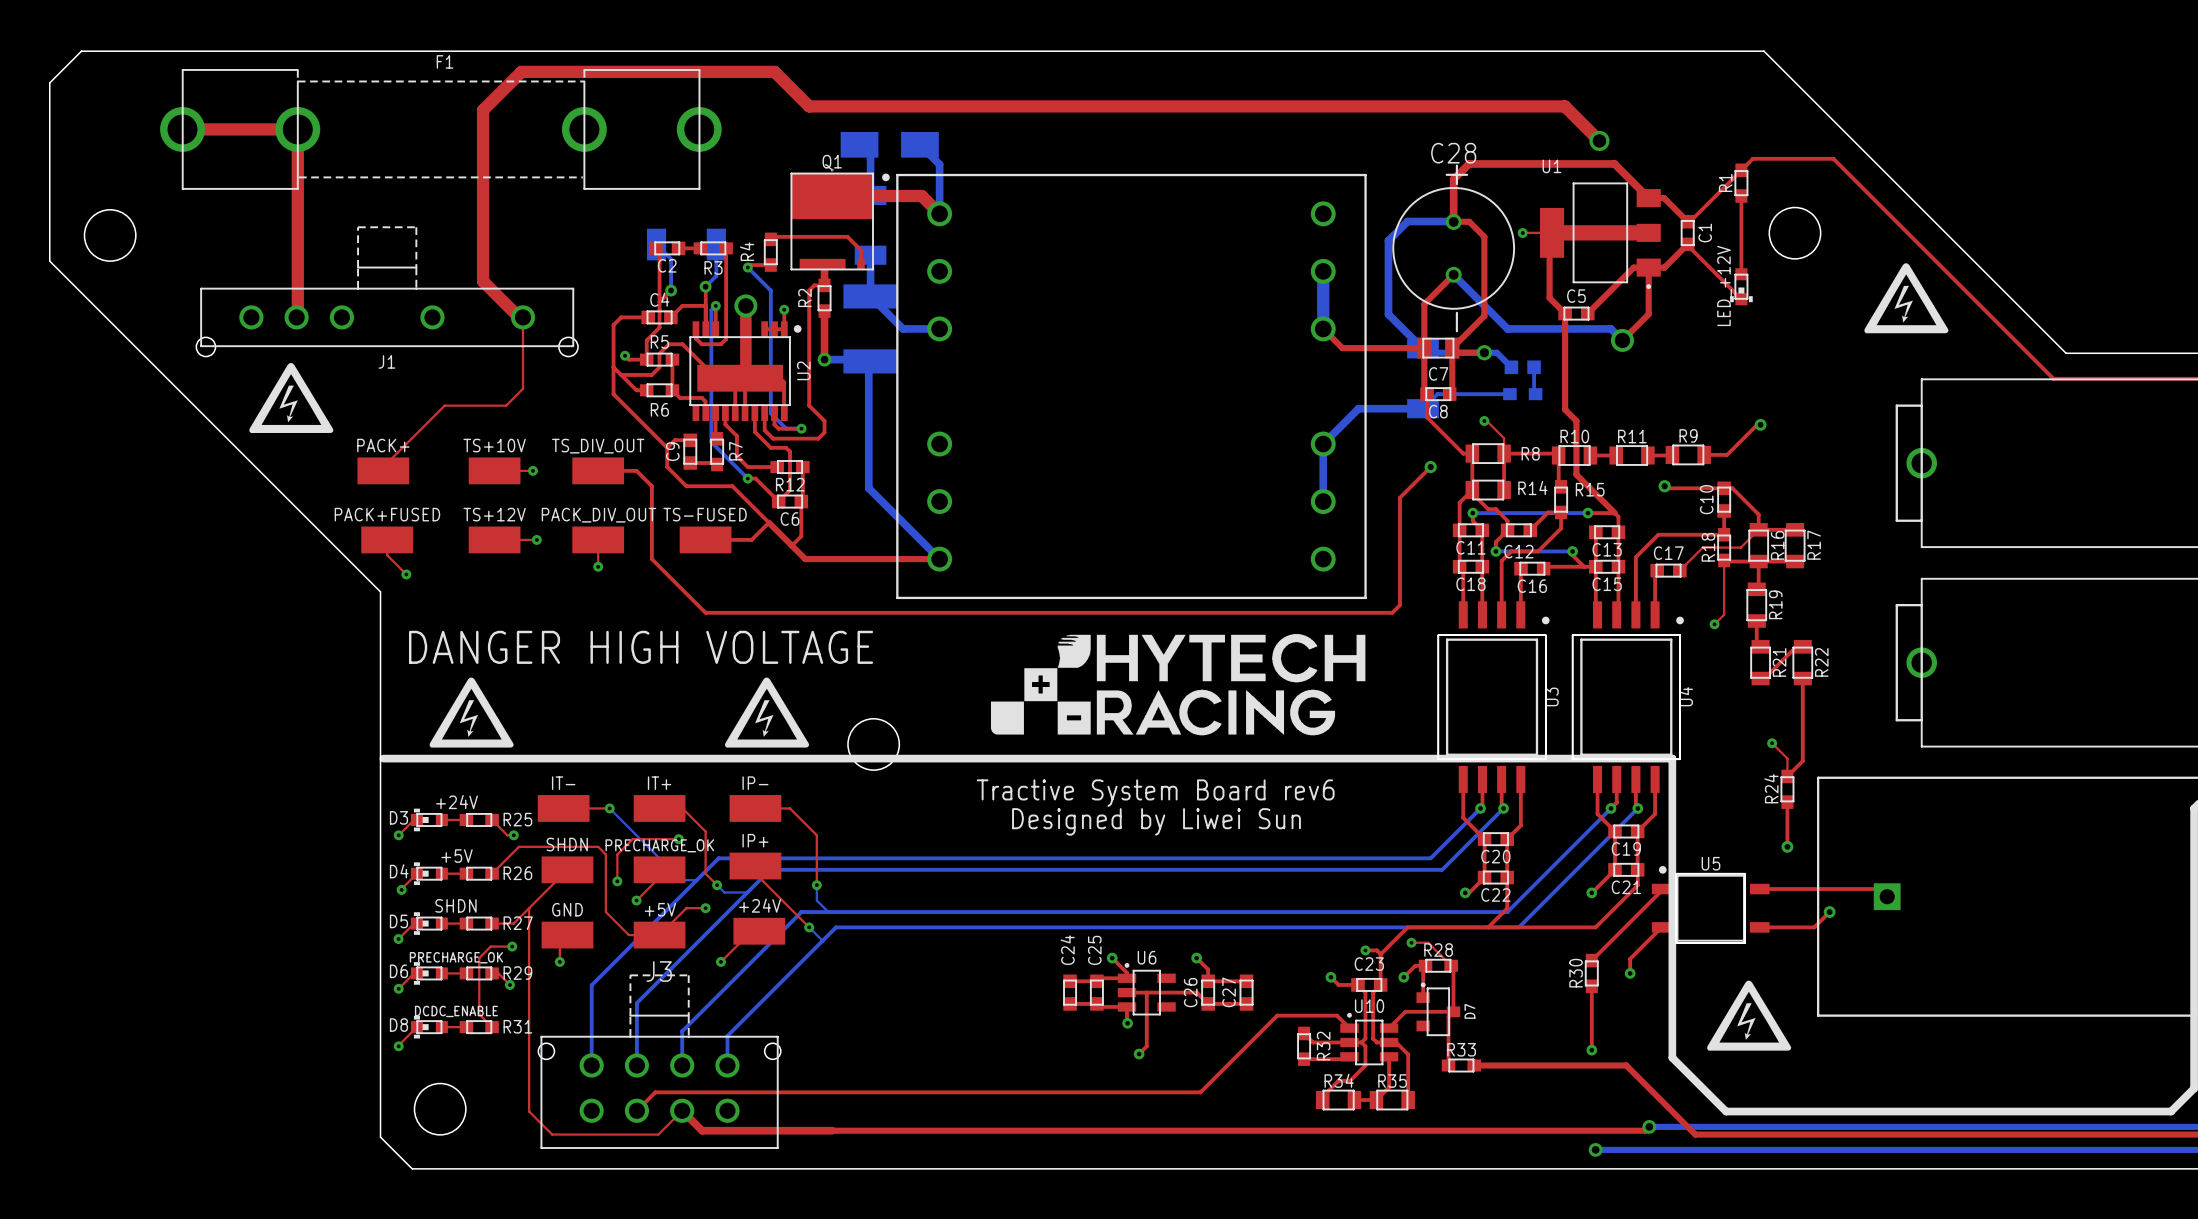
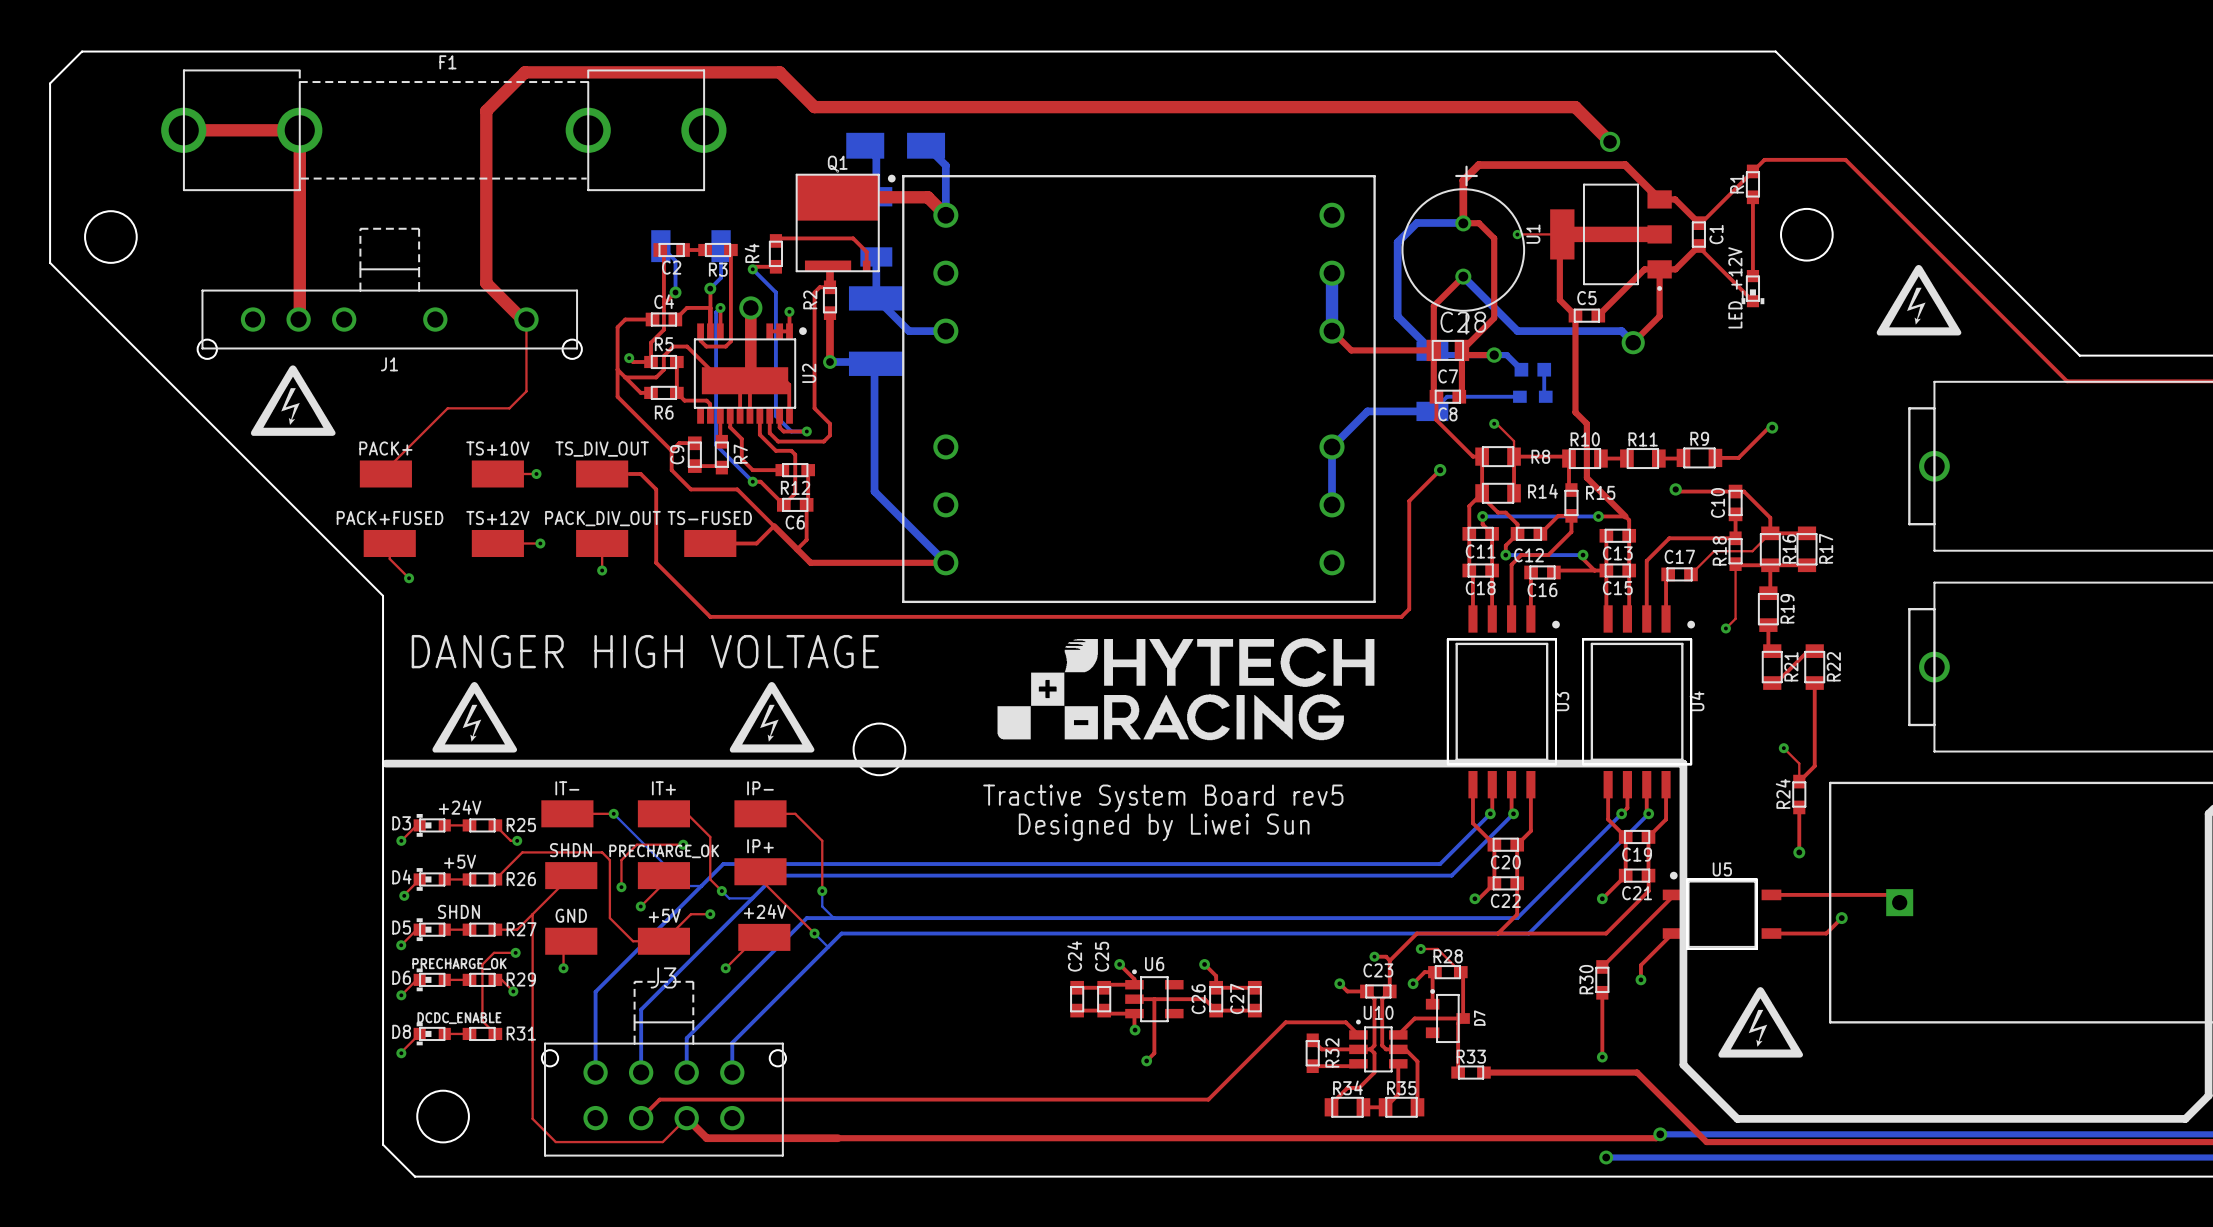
C28 name position: C28 (1453, 153) -> C28 (1463, 322)
U1 name rotation: 0° (1551, 166) -> 90° counterclockwise (1533, 234)
U1 name position: U1 (1551, 166) -> U1 (1533, 234)
top track: none -> (1517, 234) (1532, 234)
via: none -> (1517, 234)
via: (1522, 233) -> none
text: Tractive System Board rev6 (1155, 793) -> Tractive System Board rev5 (1163, 798)

